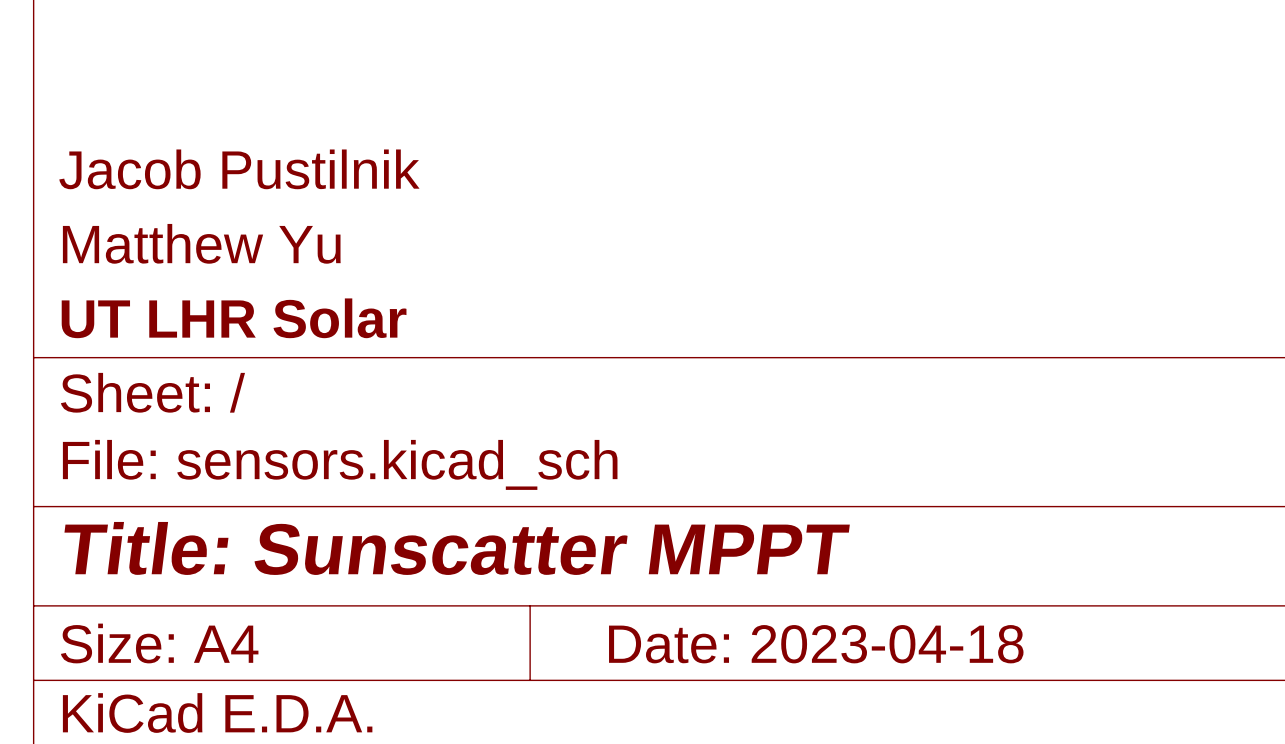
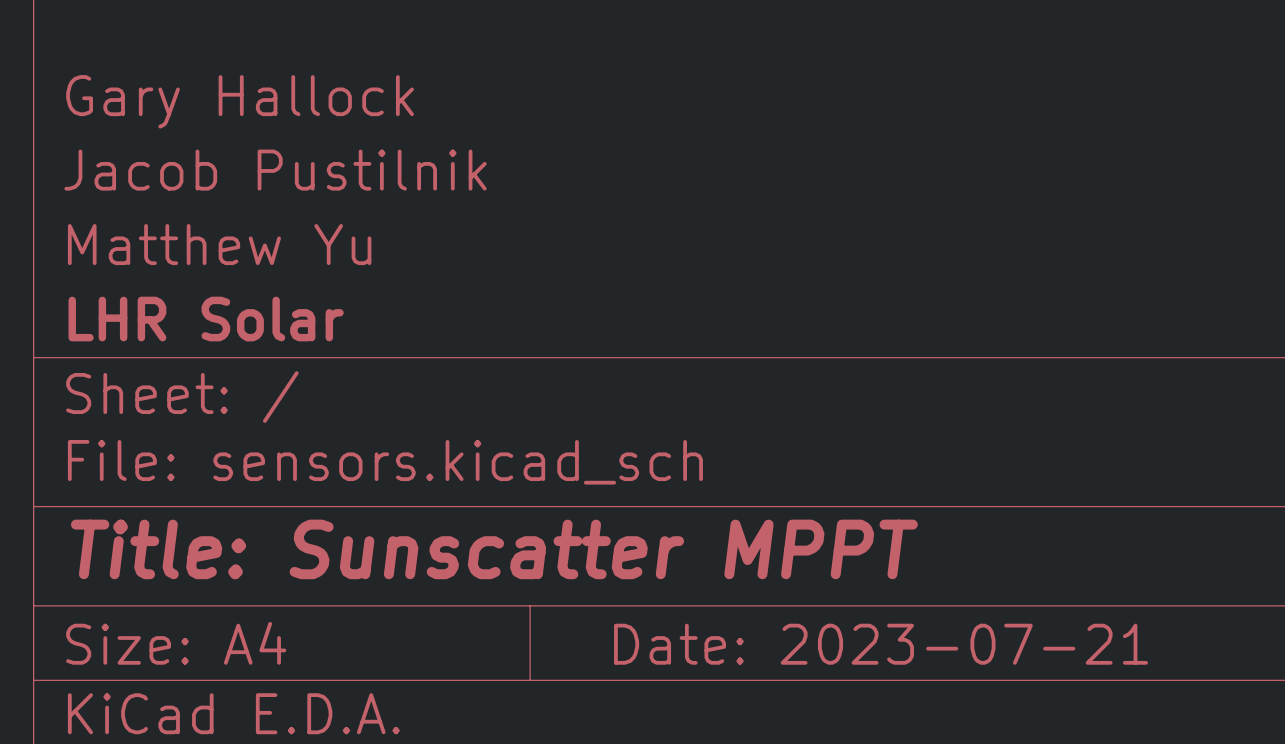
title block: none -> Gary Hallock (240, 101)
title block: UT LHR Solar (234, 318) -> LHR Solar (206, 319)
title block: Date: 2023-04-18 (816, 644) -> Date: 2023-07-21 (881, 644)

